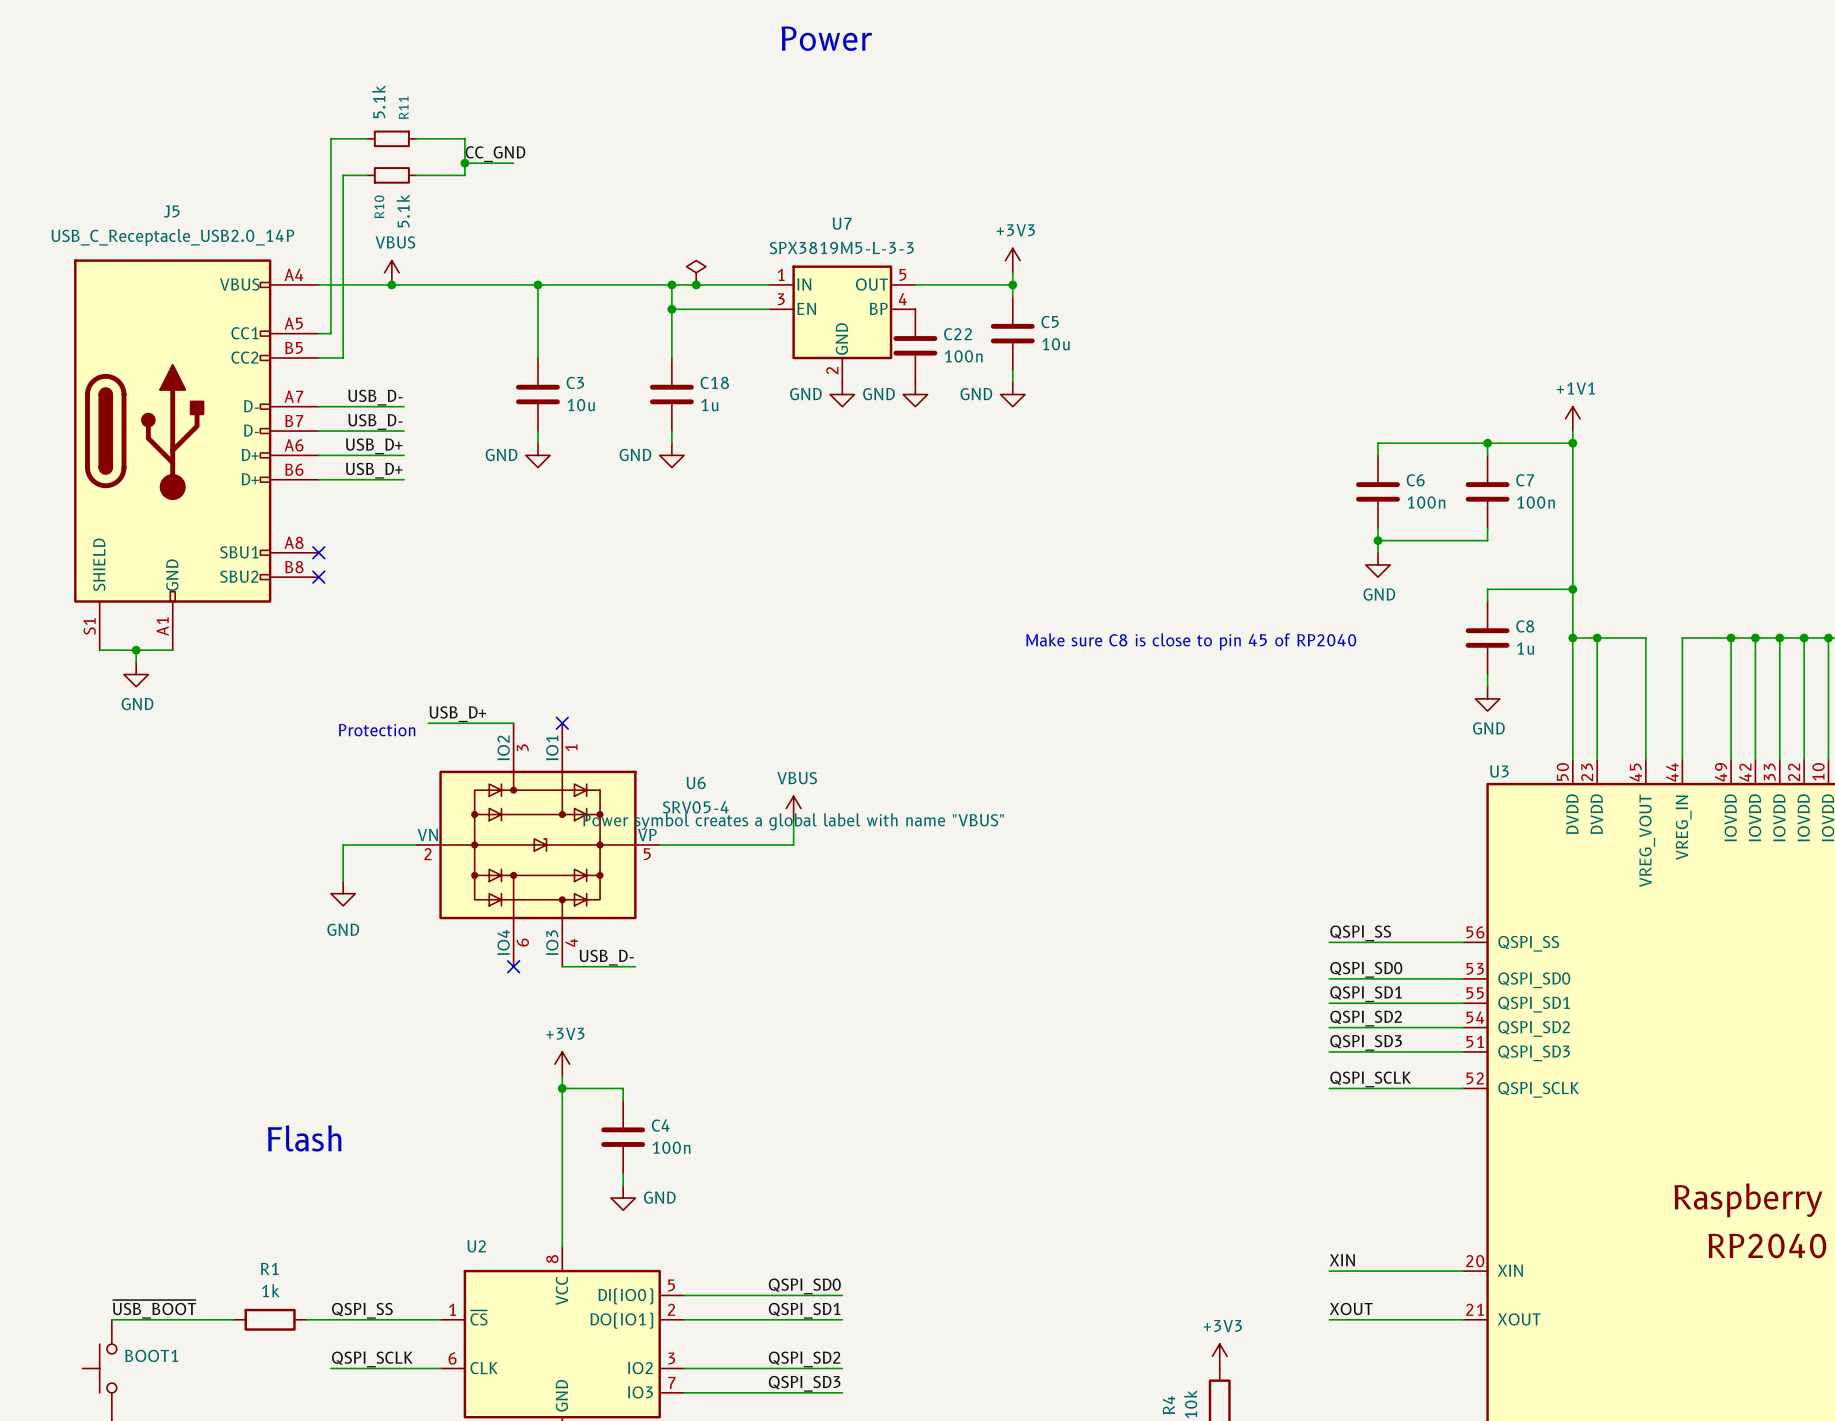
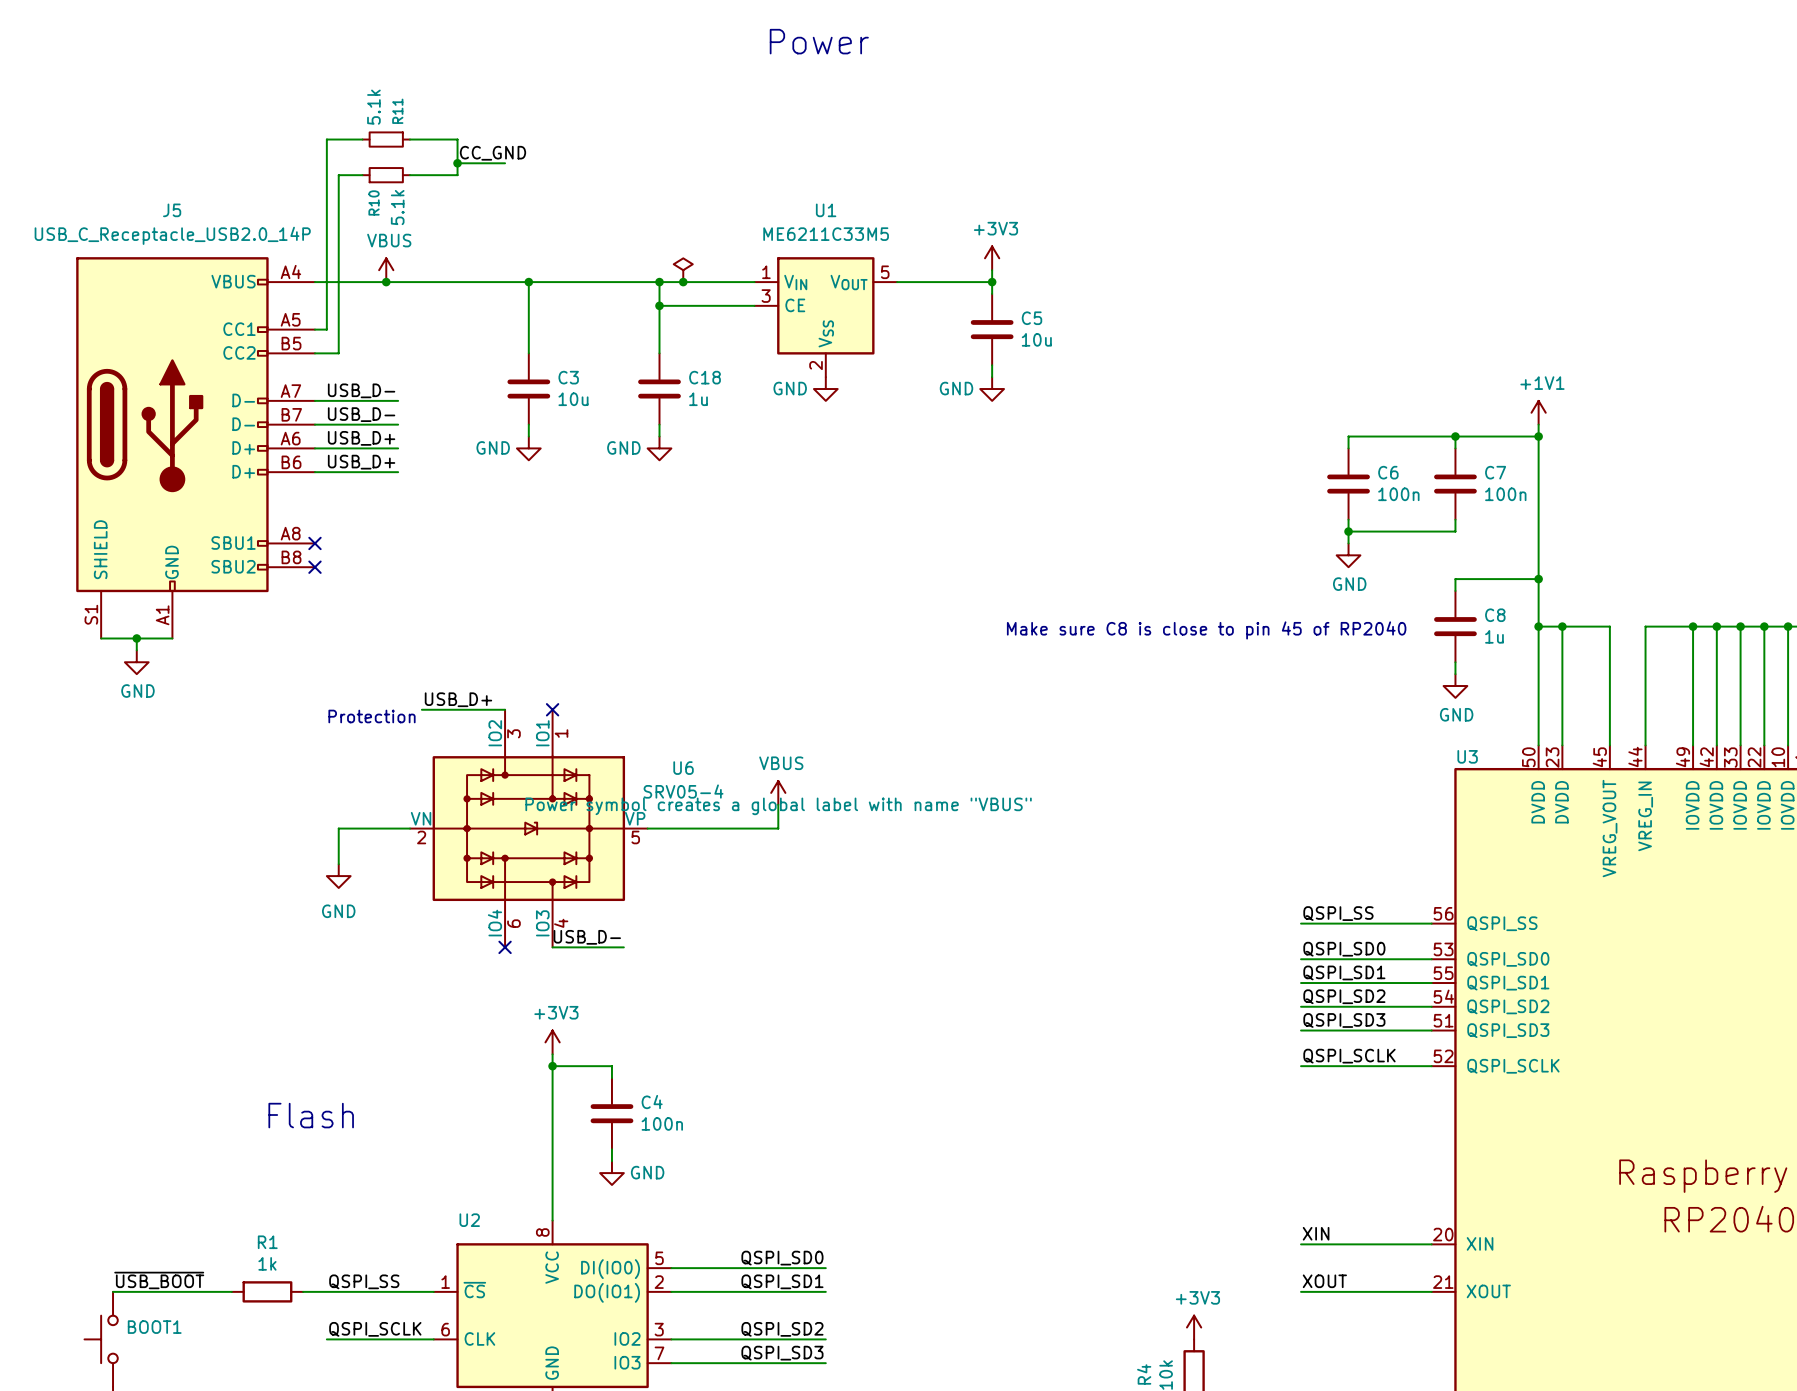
U1: none -> ME6211C33M5 (825, 317)
U7: SPX3819M5-L-3-3 (842, 323) -> none
C22: 100n (915, 345) -> none
power symbol: GND (915, 394) -> none

